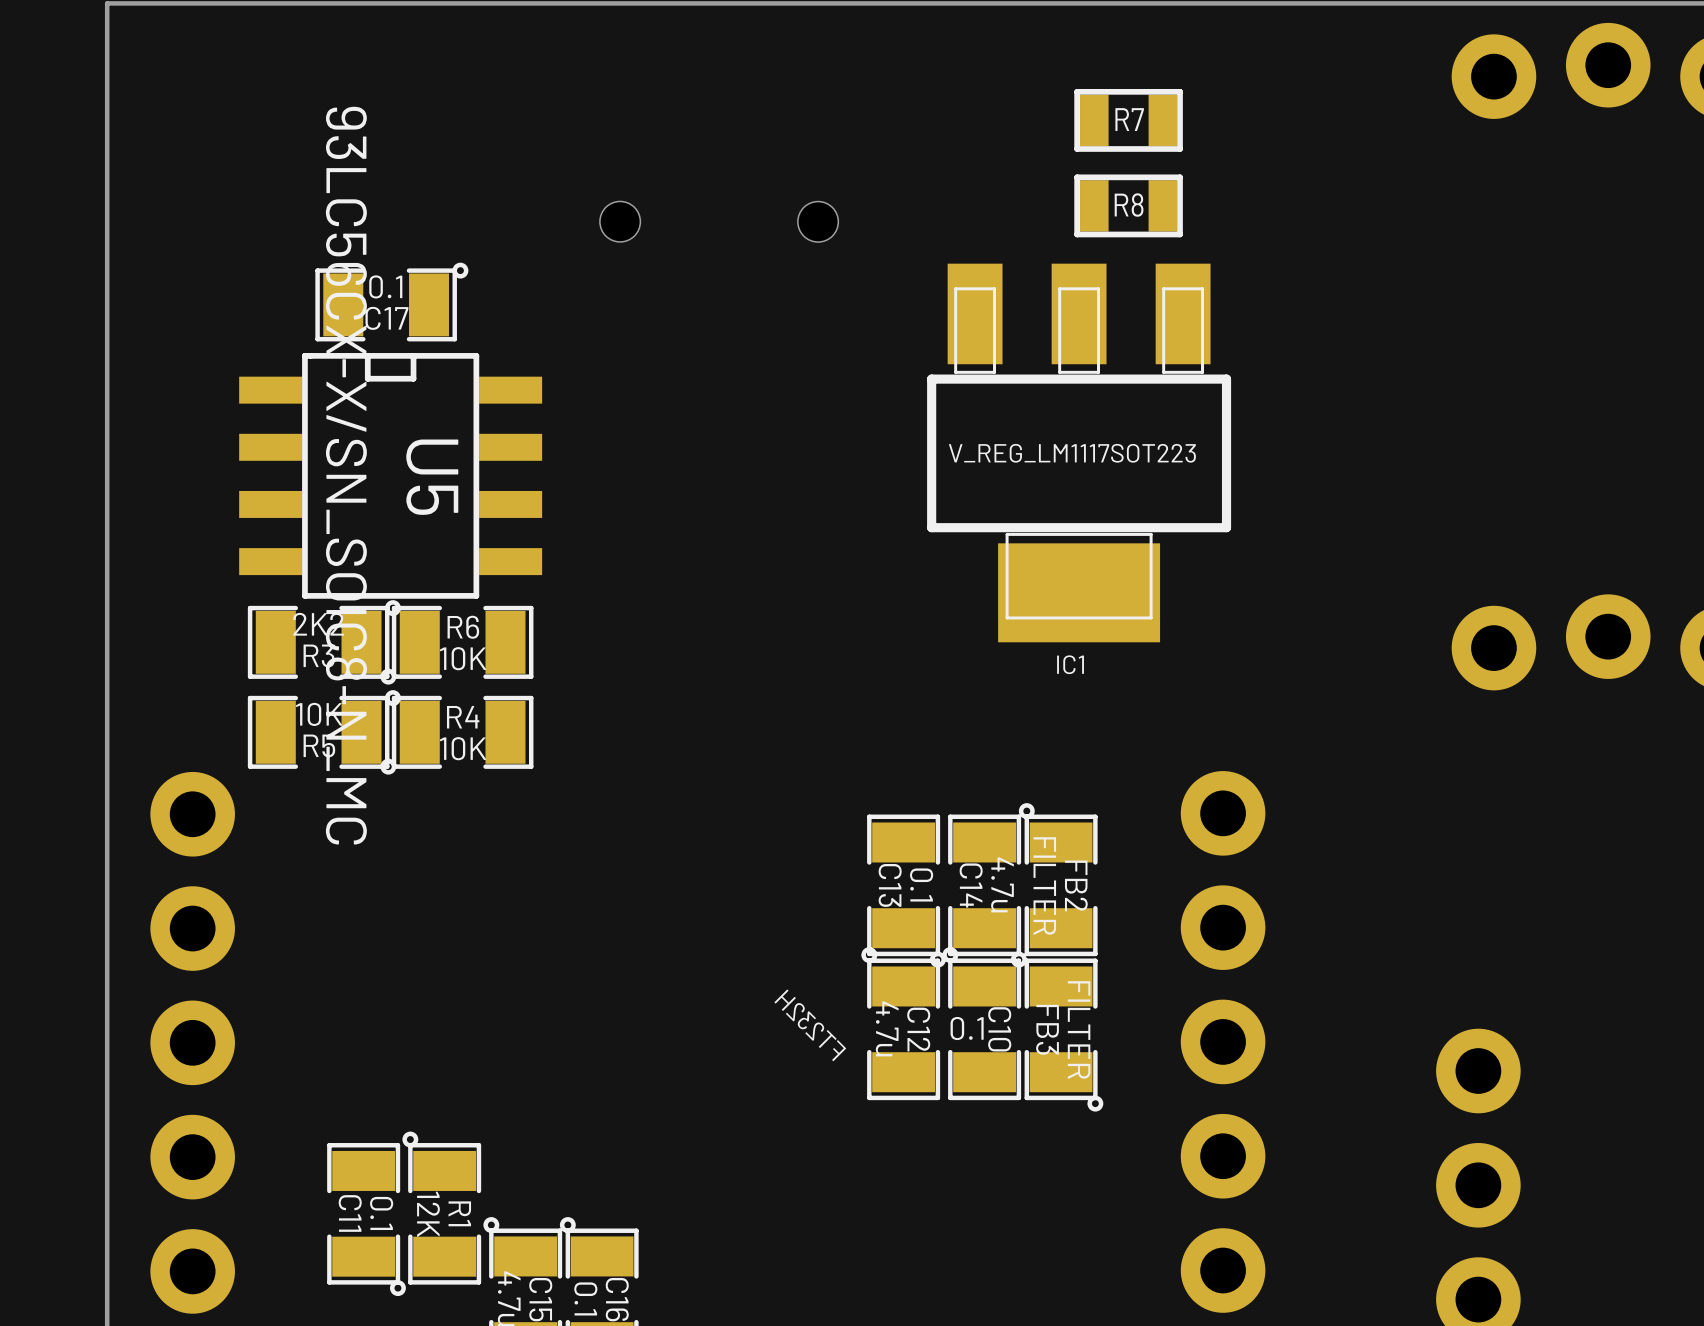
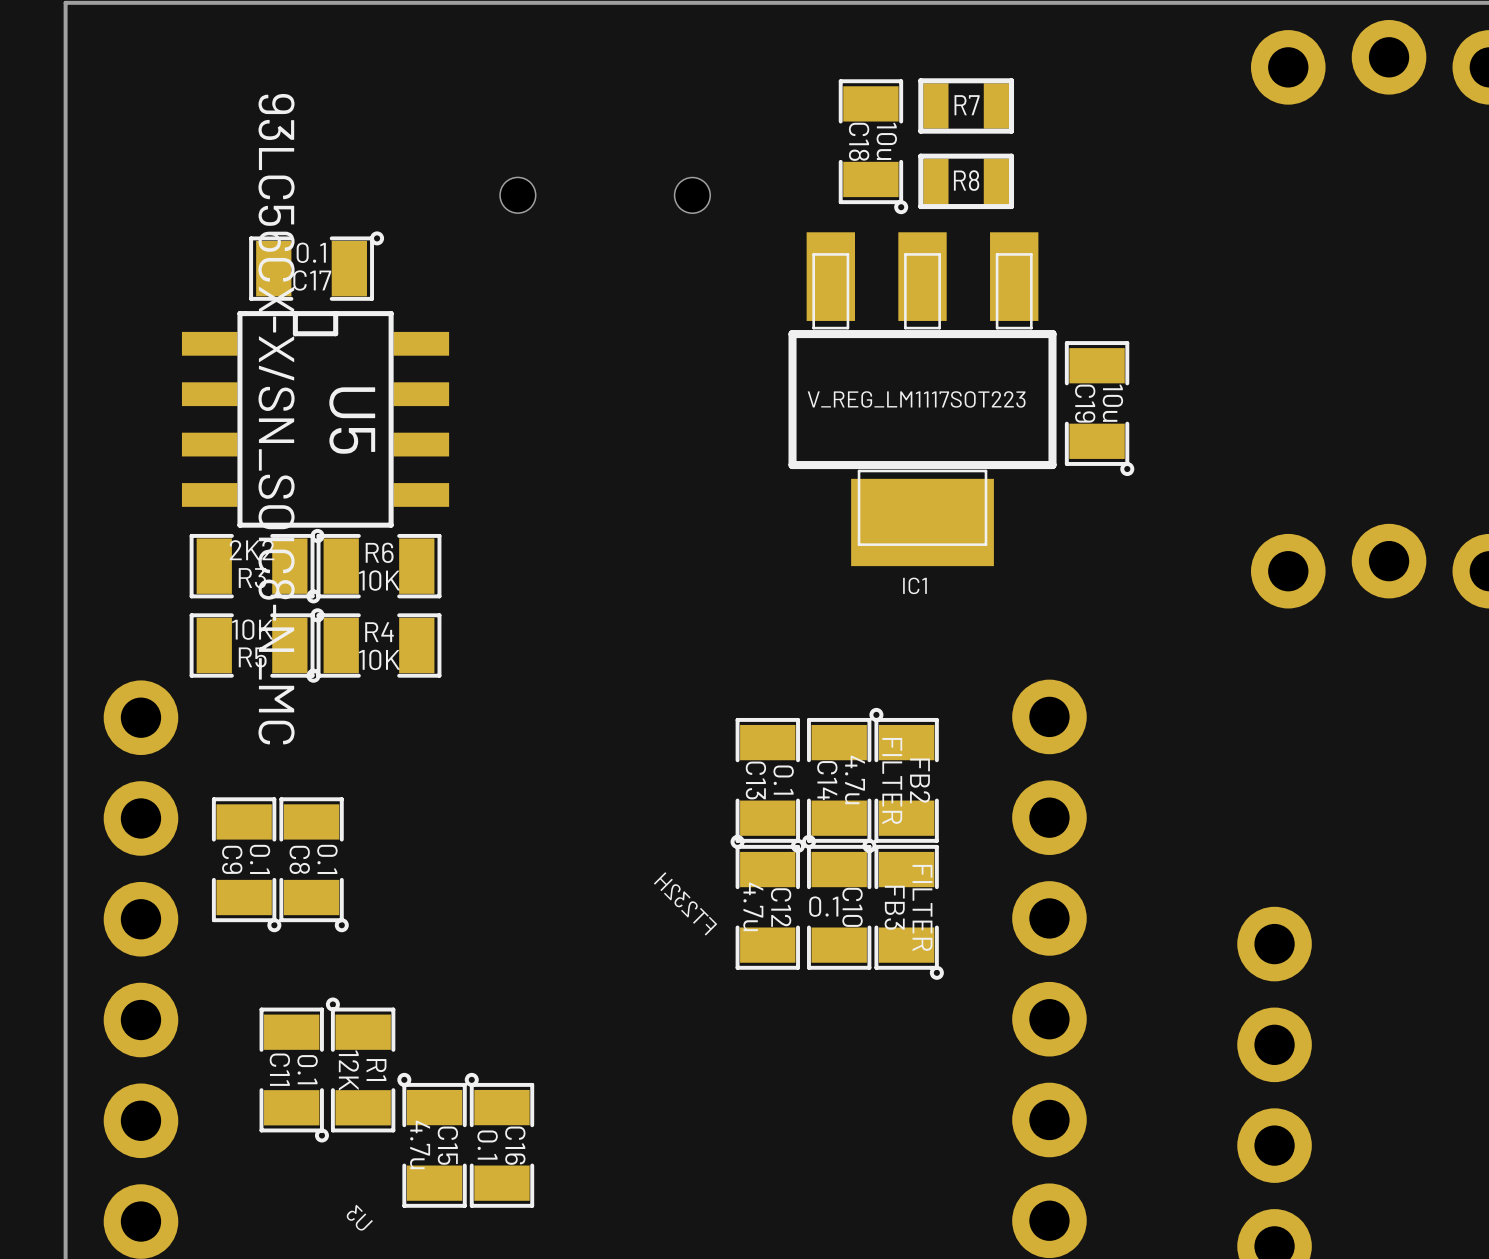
C18: none -> 10u (873, 146)
C19: none -> 10u (1099, 408)
C9: none -> 0.1 (246, 864)
C8: none -> 0.1 (314, 864)

